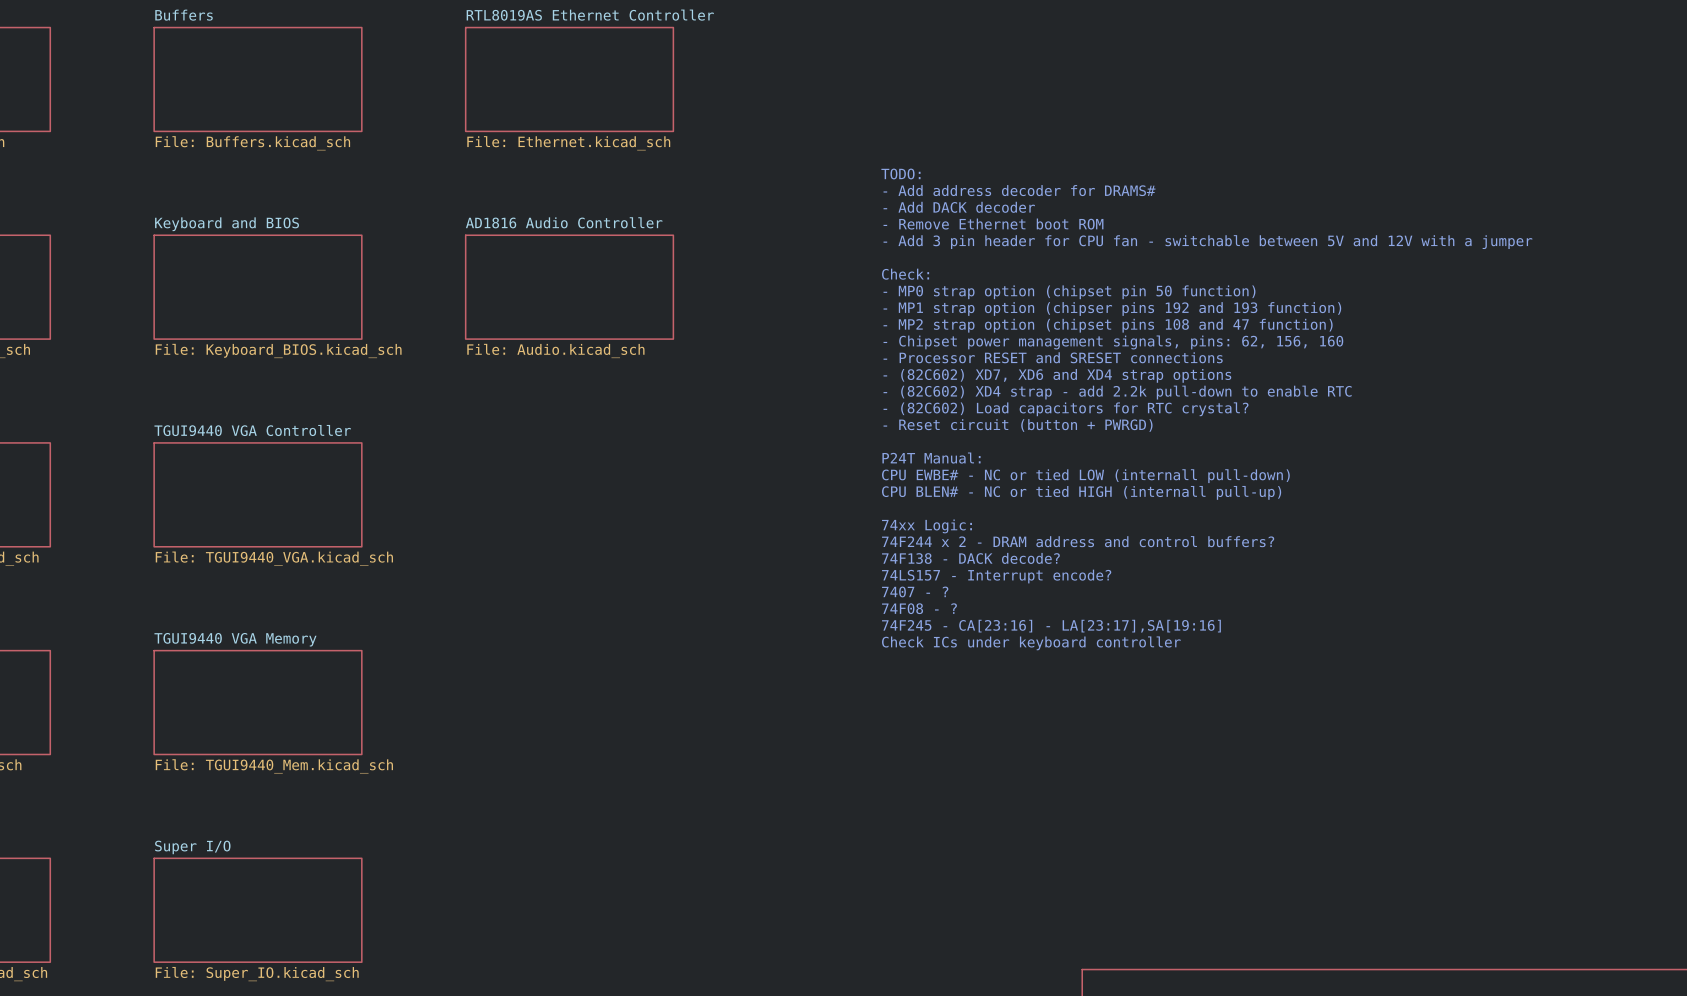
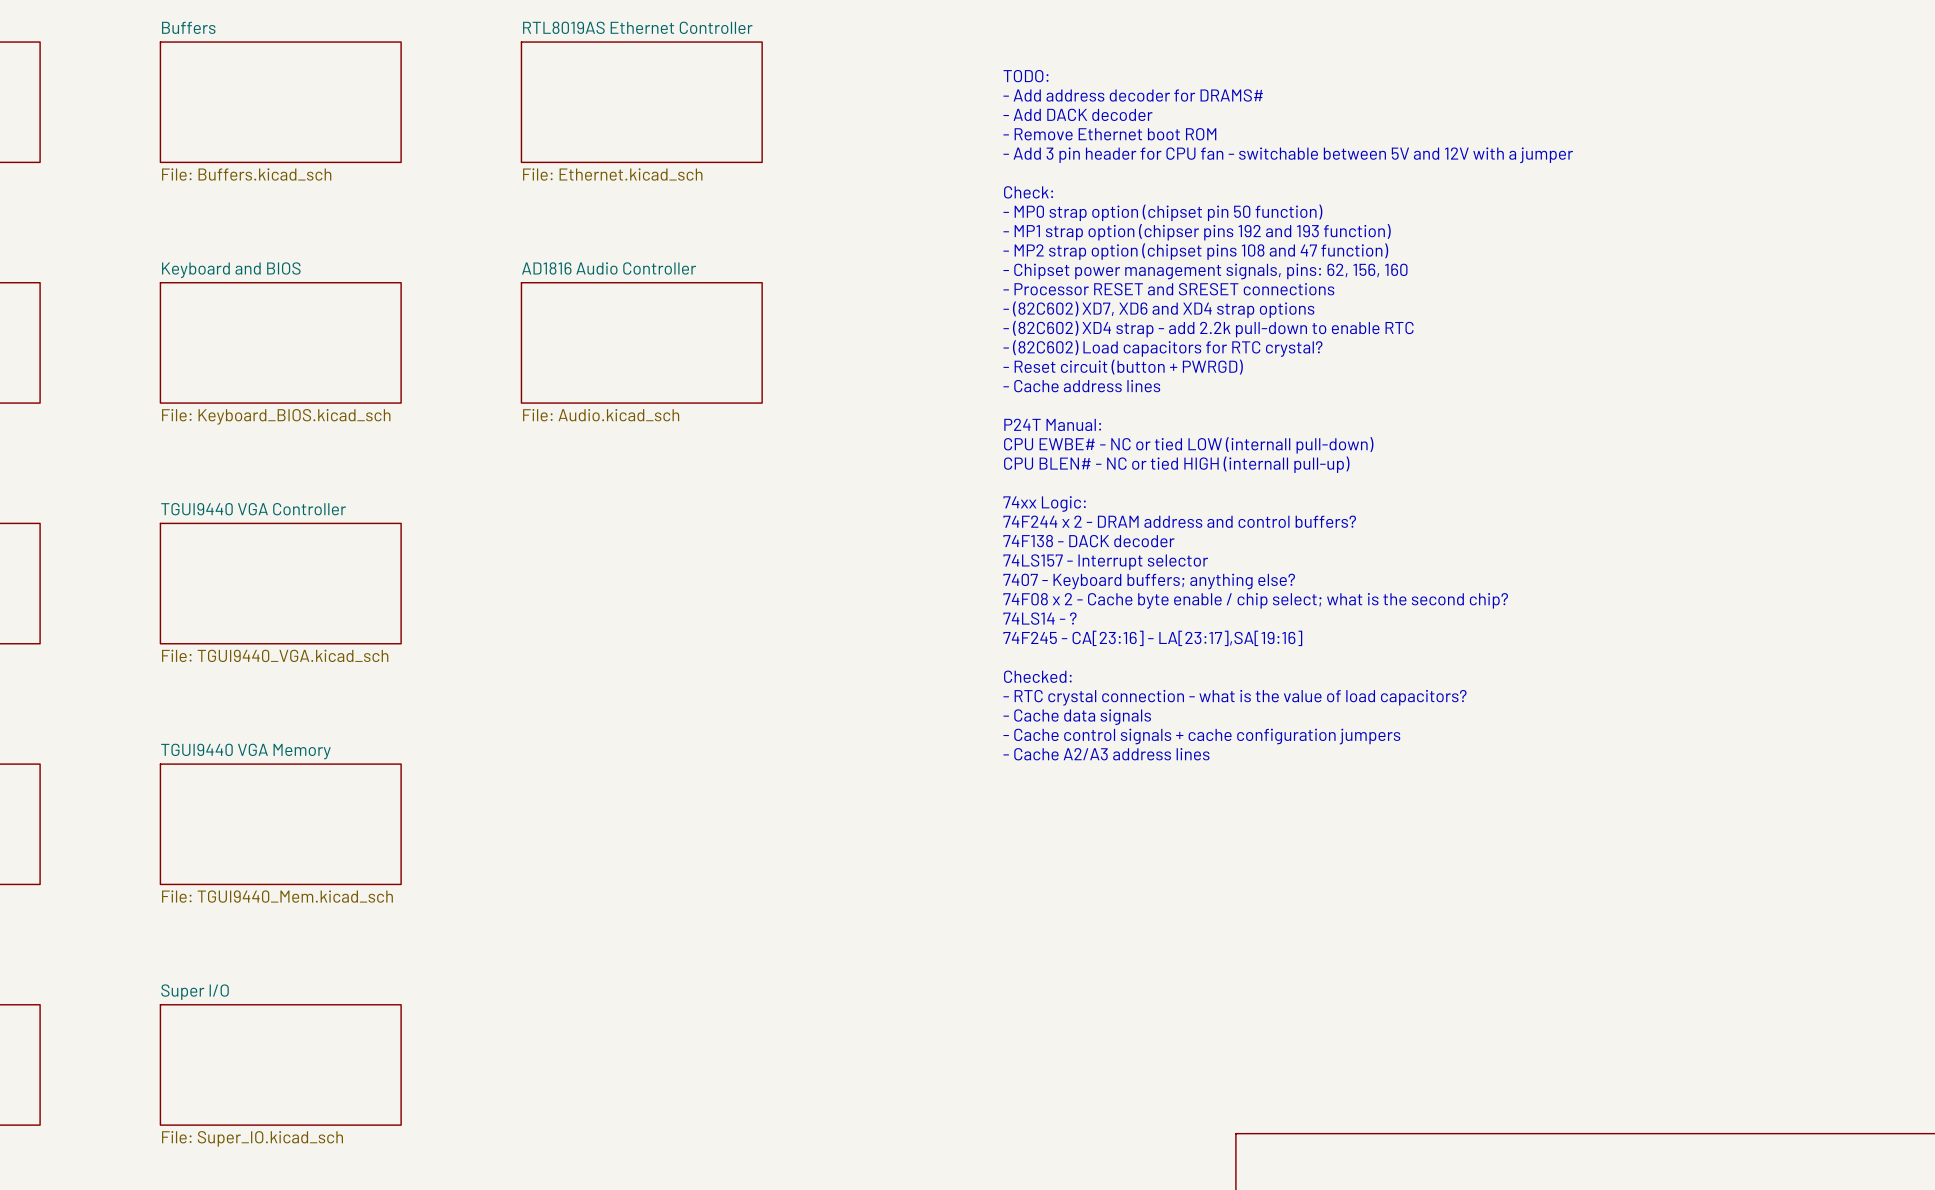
text: none -> TODO: (1026, 76)
text: none -> - Add address decoder for DRAMS# (1133, 95)
text: none -> - Add DACK decoder (1078, 114)
text: none -> - Remove Ethernet boot ROM (1109, 134)
text: none -> - Add 3 pin header for CPU fan - switchable between 5V and 12V with a jumper (1288, 155)
text: none -> Check: (1028, 192)
text: TODO: (900, 173) -> - MP0 strap option (chipset pin 50 function) (1162, 212)
text: - Add address decoder for DRAMS# (1019, 190) -> - MP1 strap option (chipser pins 192 and 193 function) (1197, 232)
text: - Add DACK decoder (959, 207) -> - MP2 strap option (chipset pins 108 and 47 function) (1195, 251)
text: - Remove Ethernet boot ROM (993, 224) -> - Chipset power management signals, pins: 62, 156, 160 (1205, 271)
text: - Add 3 pin header for CPU fan - switchable between 5V and 12V with a jumper (1207, 242) -> - Processor RESET and SRESET connections (1168, 289)
text: none -> - (82C602) XD7, XD6 and XD4 strap options (1158, 309)
text: Check: (905, 274) -> - (82C602) XD4 strap - add 2.2k pull-down to enable RTC (1208, 329)
text: - MP0 strap option (chipset pin 50 function) (1069, 292) -> - (82C602) Load capacitors for RTC crystal? (1162, 348)
text: - MP1 strap option (chipser pins 192 and 193 function) (1112, 309) -> - Reset circuit (button + PWRGD) (1123, 367)
text: - MP2 strap option (chipset pins 108 and 47 function) (1108, 325) -> - Cache address lines (1081, 386)
text: - Chipset power management signals, pins: 62, 156, 160 (1113, 342) -> none
text: - Processor RESET and SRESET connections (1053, 357) -> P24T Manual: (1052, 424)
text: - (82C602) XD7, XD6 and XD4 strap options (1057, 375) -> CPU EWBE# - NC or tied LOW (internall pull-down) (1188, 445)
text: - (82C602) XD4 strap - add 2.2k pull-down to enable RTC (1117, 392) -> CPU BLEN# - NC or tied HIGH (internall pull-up) (1176, 464)
text: - (82C602) Load capacitors for RTC crystal? (1066, 409) -> none
text: - Reset circuit (button + PWRGD) (1018, 425) -> 74xx Logic: (1044, 503)
text: none -> 74F244 x 2 - DRAM address and control buffers? (1179, 521)
text: P24T Manual: (931, 458) -> 74F138 - DACK decoder (1088, 541)
text: CPU EWBE# - NC or tied LOW (internall pull-down) (1085, 476) -> 74LS157 - Interrupt selector (1105, 562)
text: CPU BLEN# - NC or tied HIGH (internall pull-up) (1081, 492) -> 7407 - Keyboard buffers; anything else? (1149, 581)
text: none -> 74F08 x 2 - Cache byte enable / chip select; what is the second chip? (1255, 600)
text: 74xx Logic: (927, 526) -> 74LS14 - ? (1039, 618)
text: 74F244 x 2 - DRAM address and control buffers? (1078, 541) -> 74F245 - CA[23:16] - LA[23:17],SA[19:16] (1152, 638)
text: 74F138 - DACK decode? (970, 558) -> none
text: 74LS157 - Interrupt encode? (996, 576) -> Checked: (1037, 676)
text: 7407 - ? (915, 591) -> - RTC crystal connection - what is the value of load capacitors? (1235, 697)
text: 74F08 - ? (919, 608) -> - Cache data signals (1077, 717)
text: 74F245 - CA[23:16] - LA[23:17],SA[19:16] (1051, 626) -> - Cache control signals + cache configuration jumpers (1201, 736)
text: Check ICs under keyboard controller (1031, 643) -> - Cache A2/A3 address lines (1106, 754)

